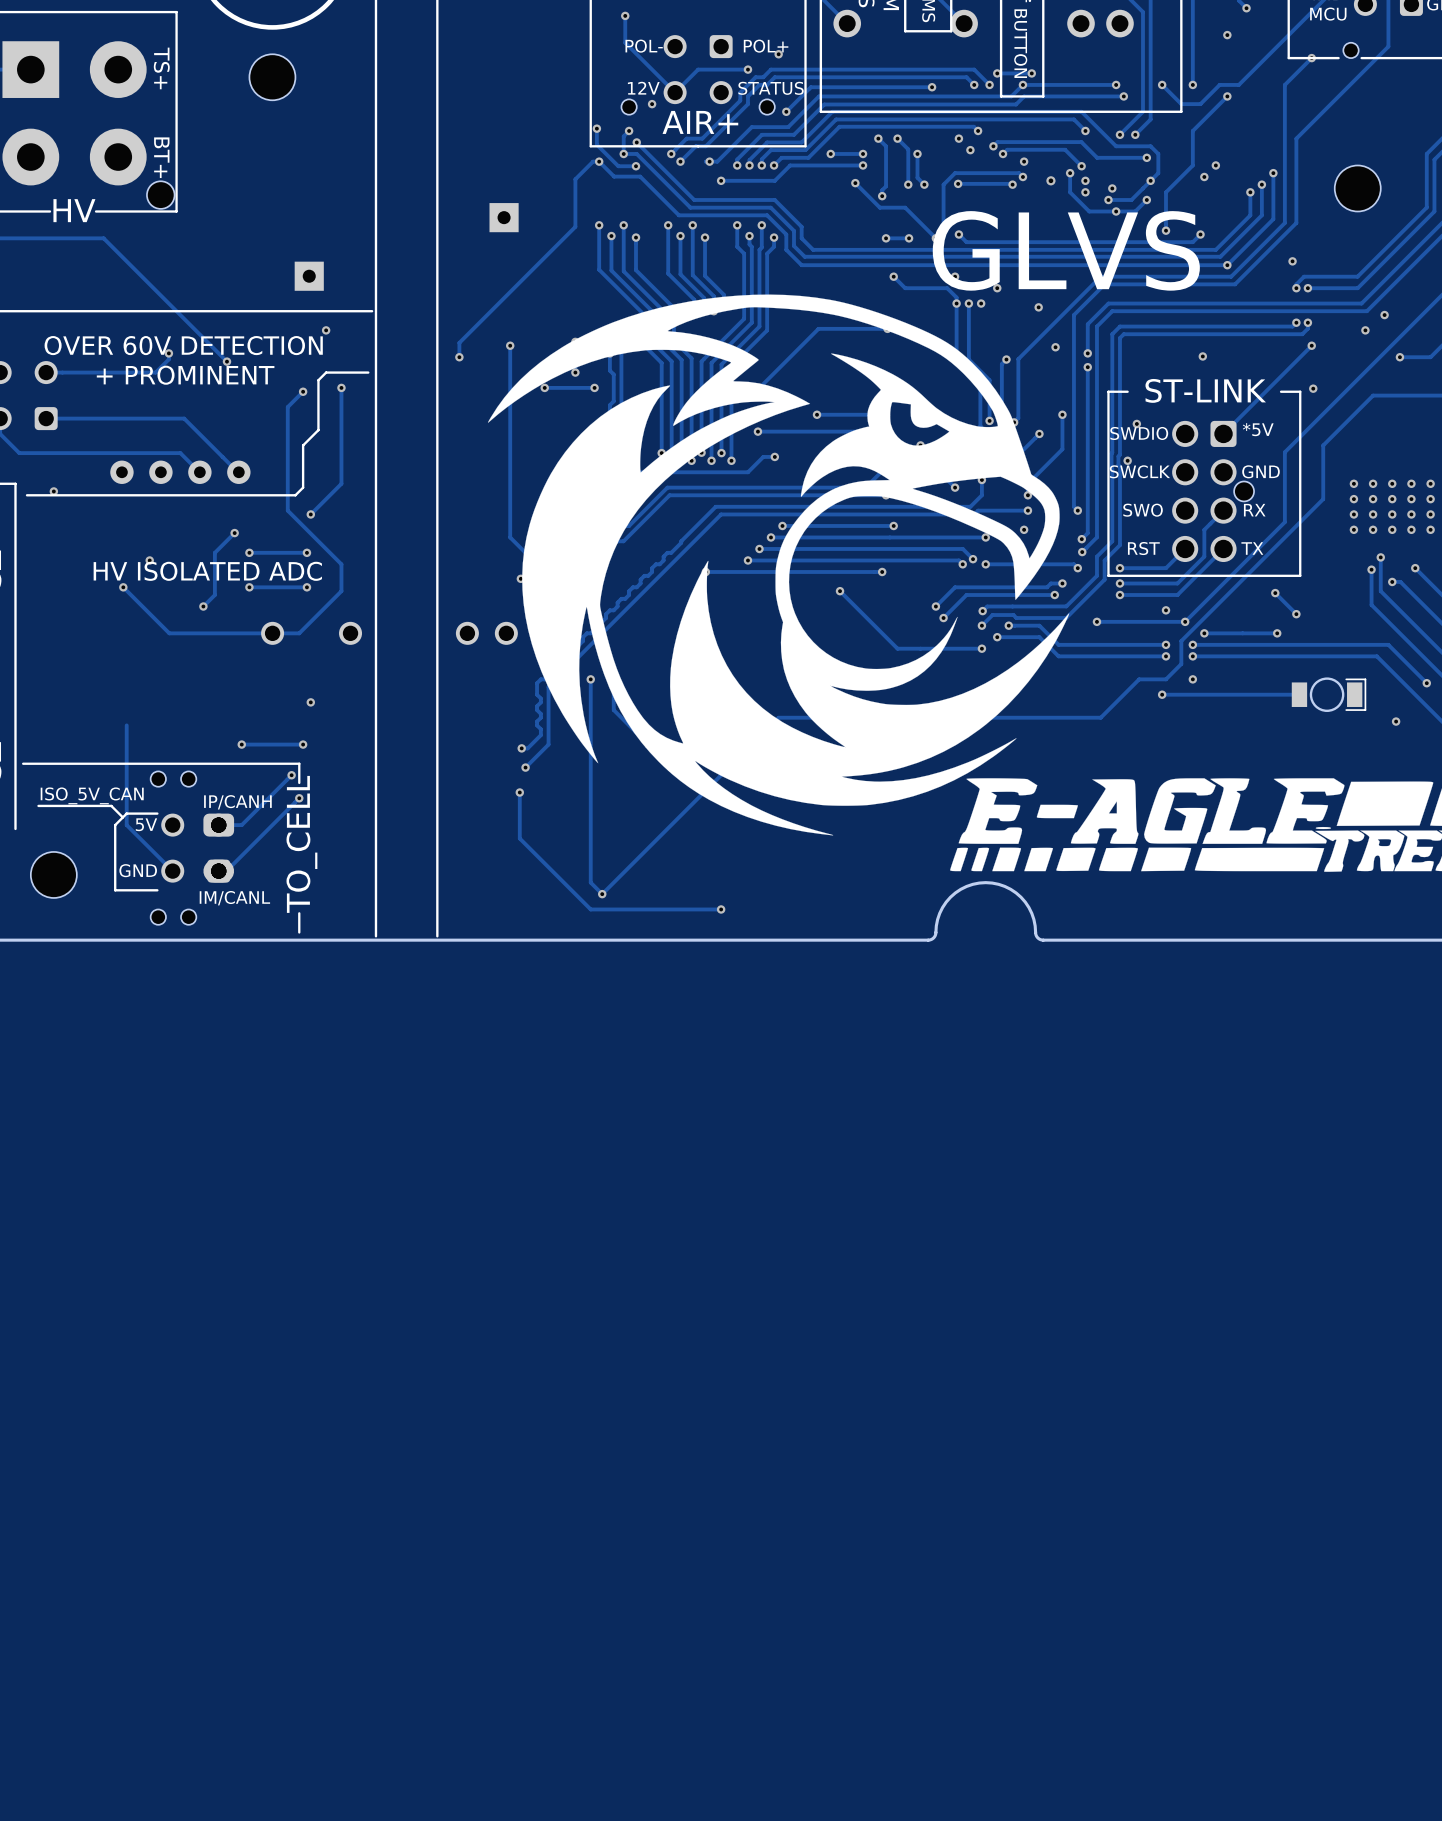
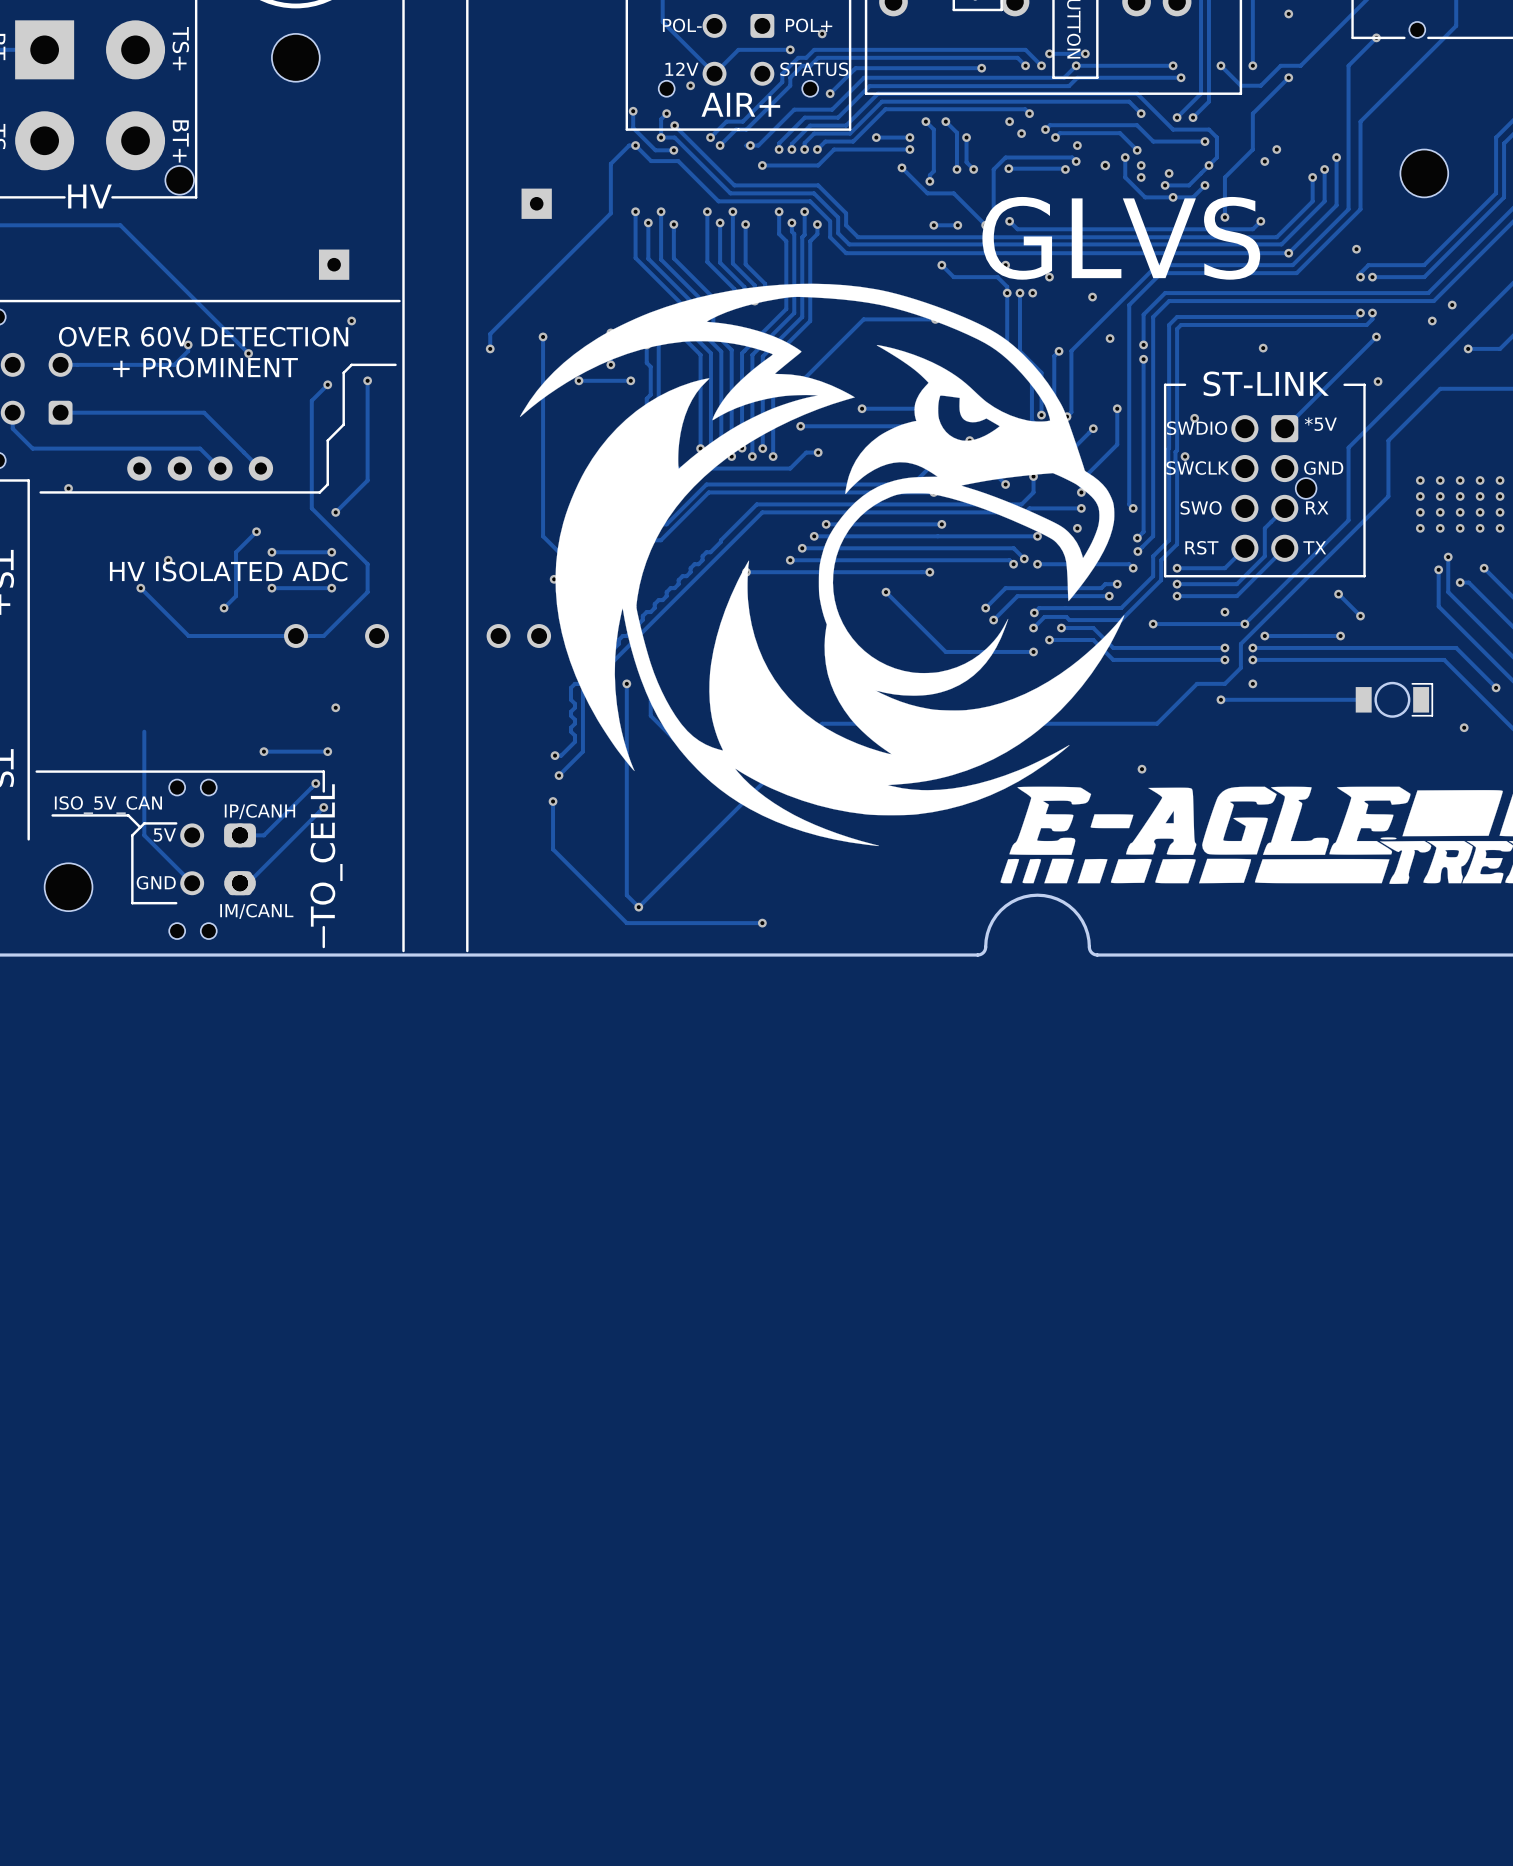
via: none -> (1142, 769)

